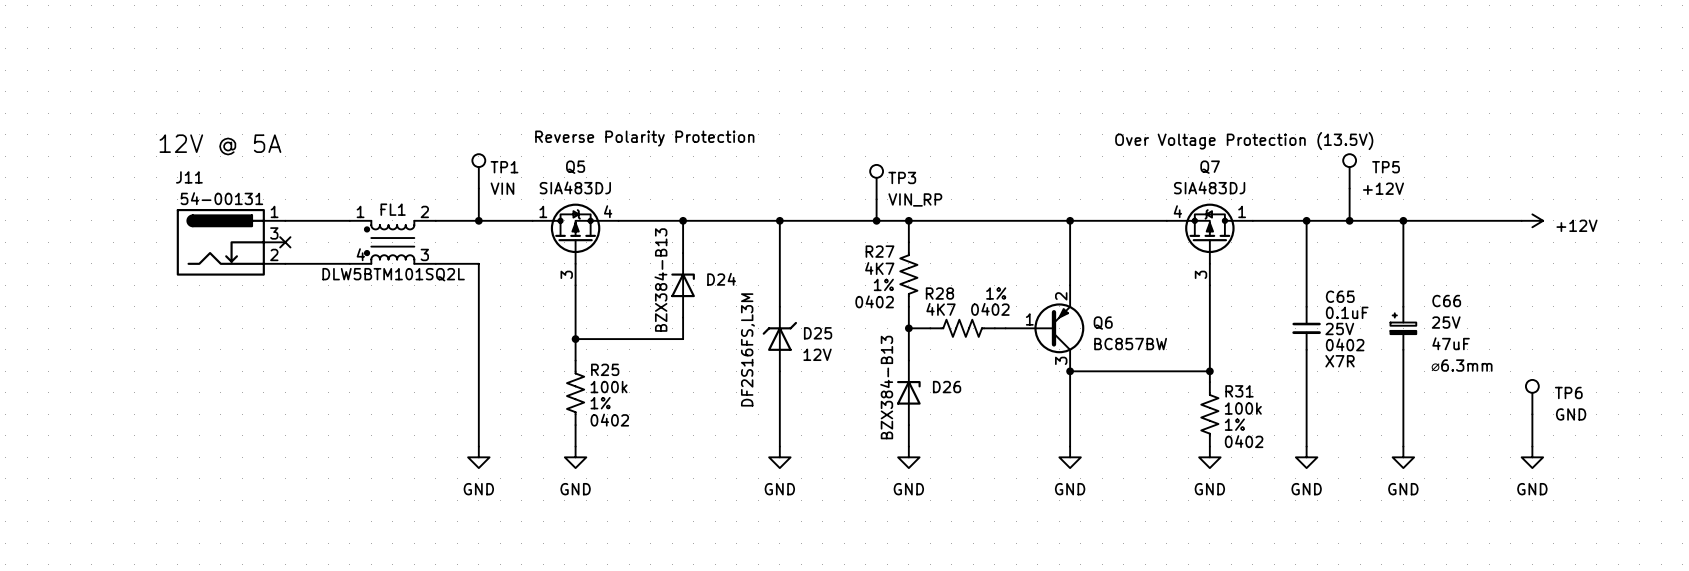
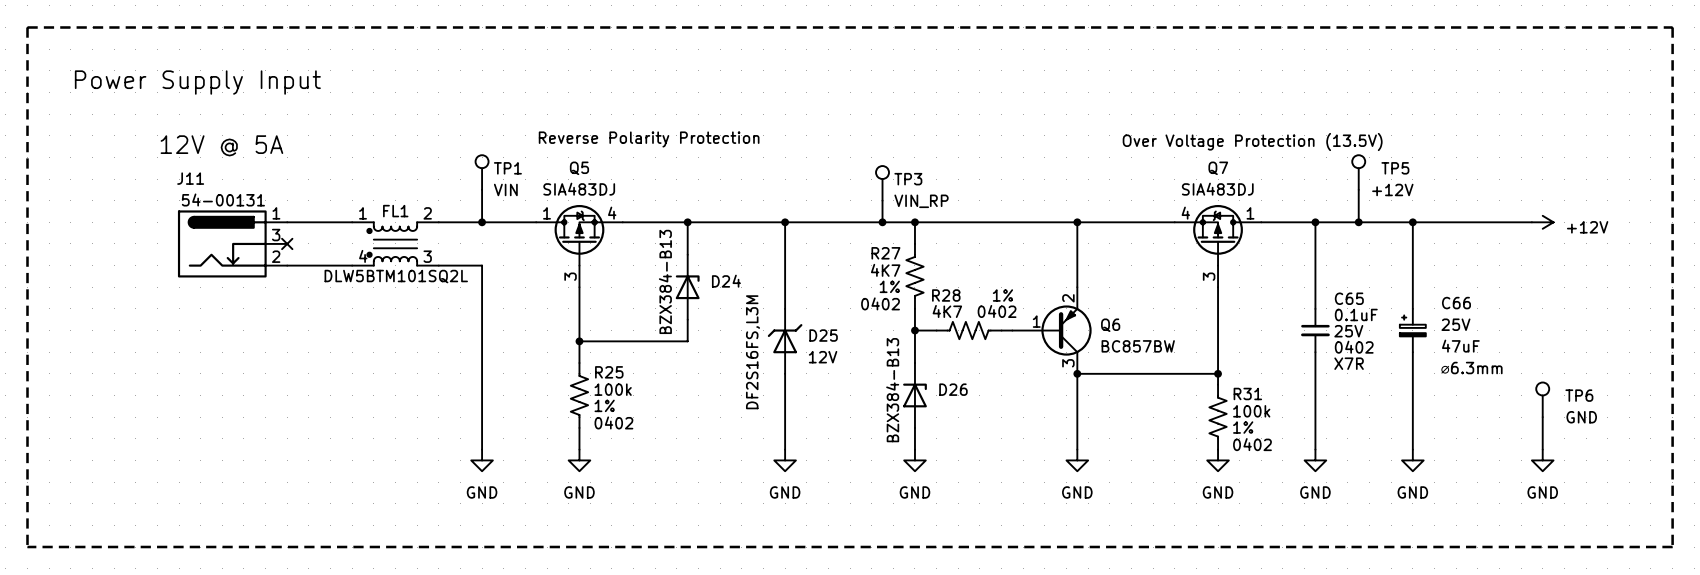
line: none -> (27, 27) (27, 547) (1672, 547) (1672, 27) (27, 27)
text: none -> Power Supply Input (197, 82)

